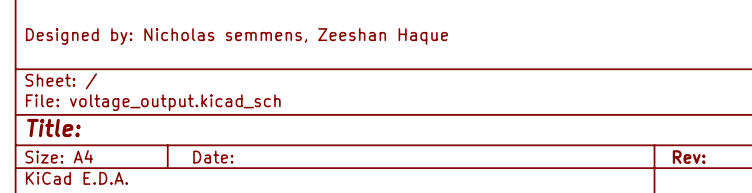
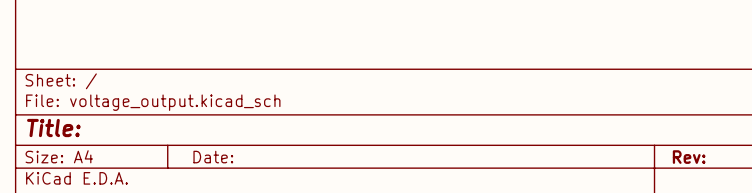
title block: Designed by: Nicholas semmens, Zeeshan Haque (236, 36) -> none

